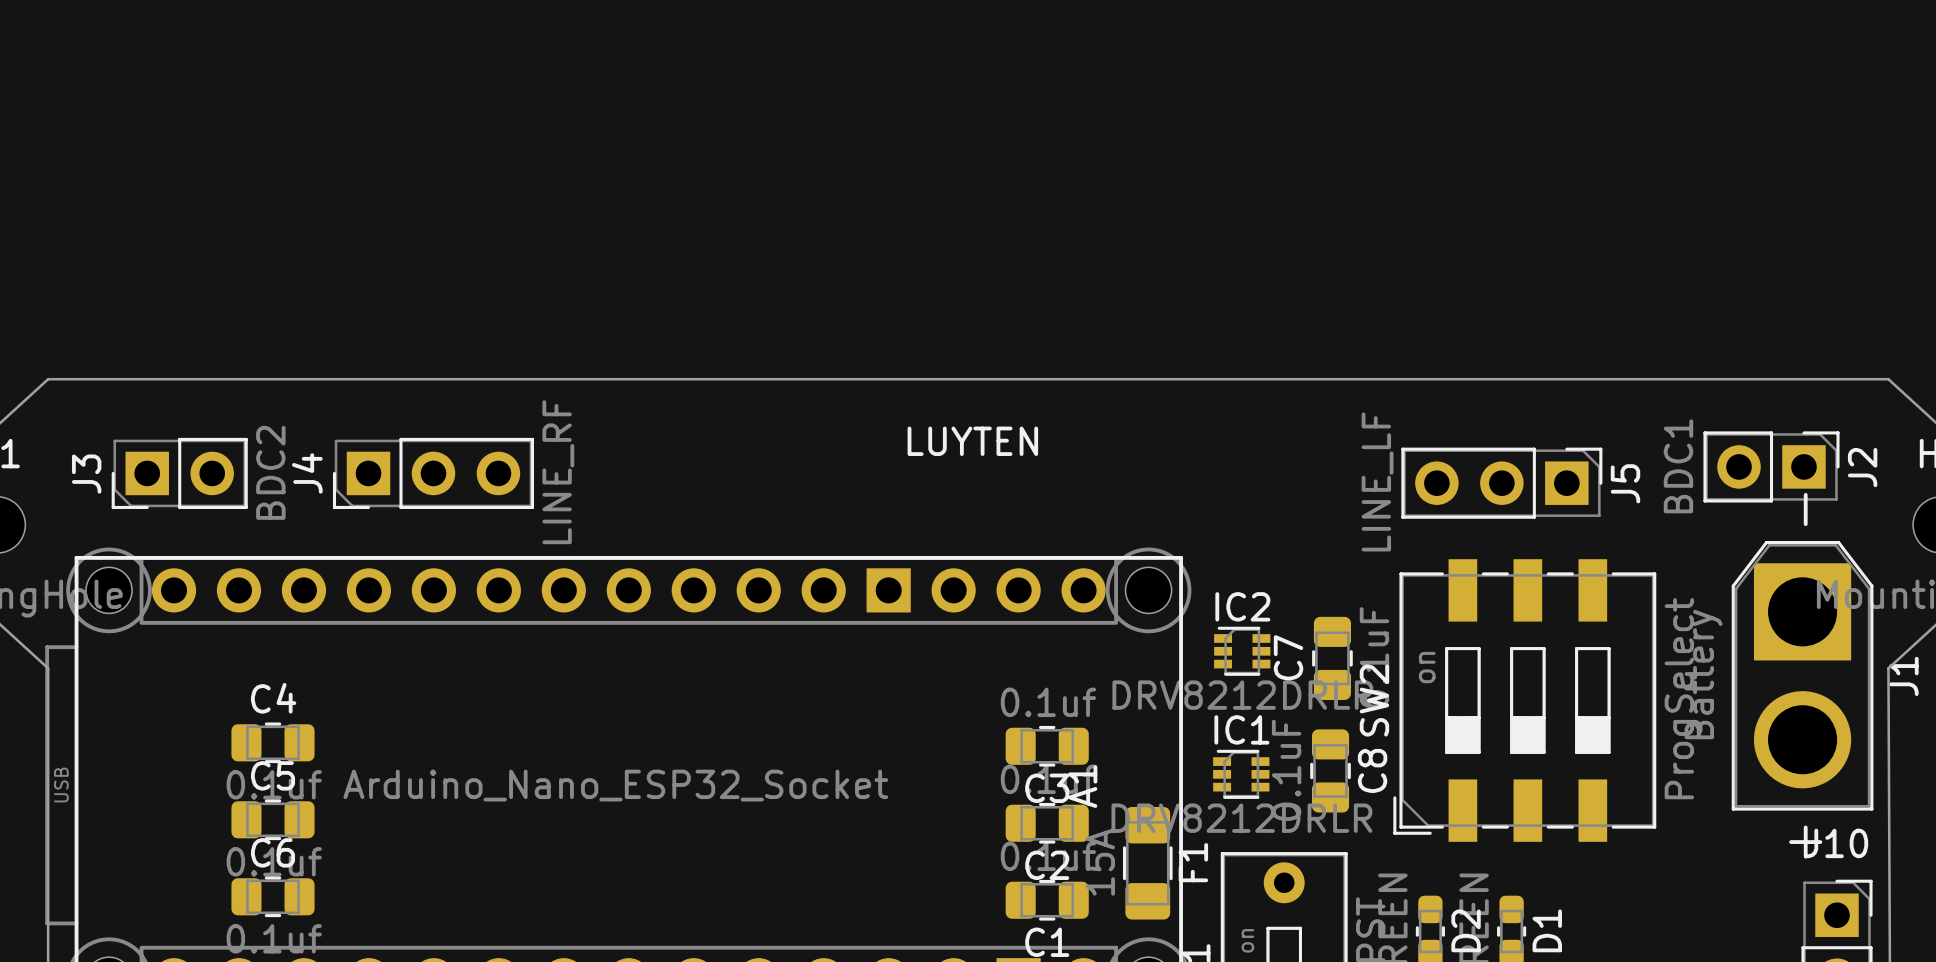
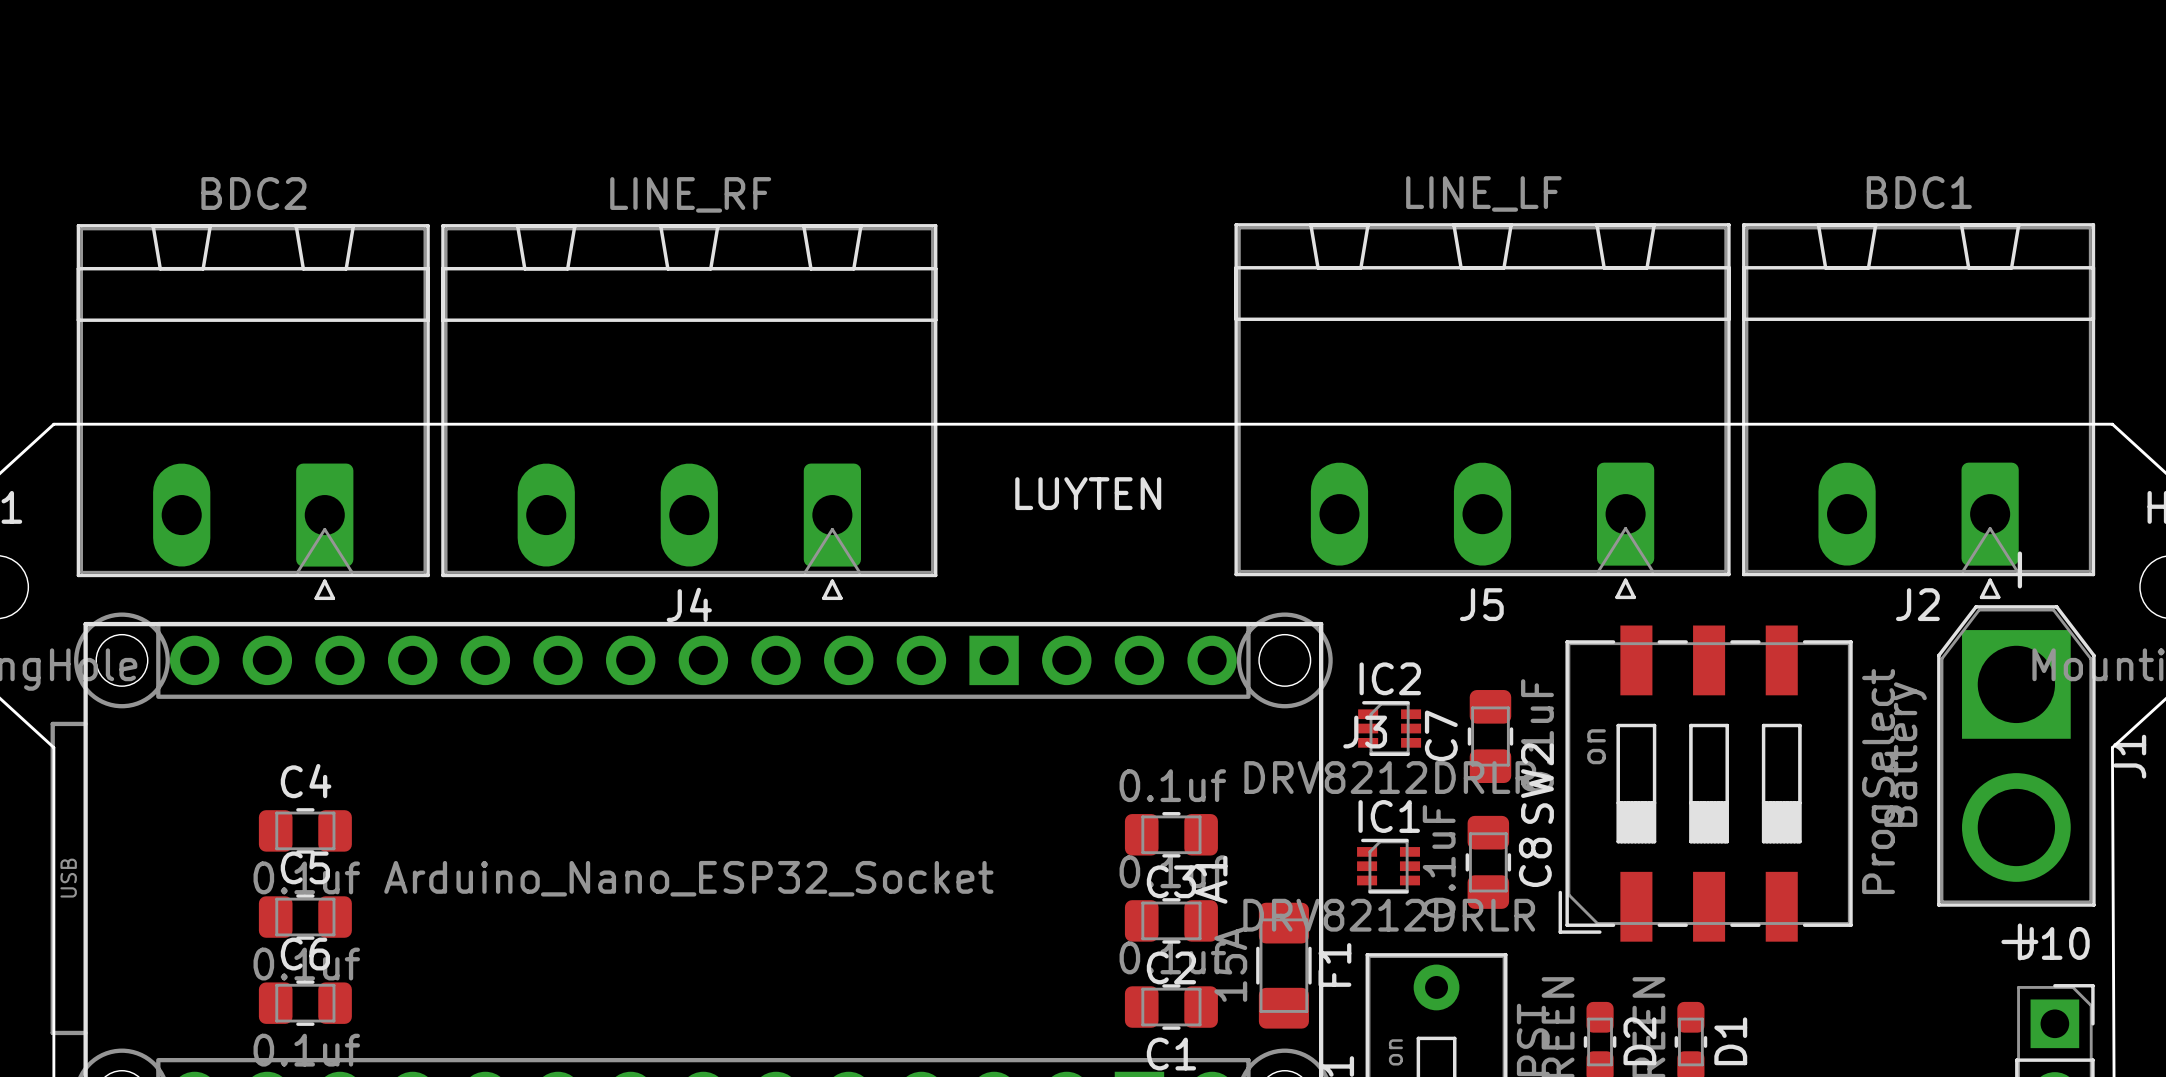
J2 footprint: [1703, 431, 1840, 503] -> [1742, 223, 2096, 600]
J3 footprint: [111, 437, 248, 509] -> [76, 224, 430, 601]
J4 footprint: [332, 437, 535, 509] -> [441, 224, 938, 601]
J5 footprint: [1401, 447, 1603, 519] -> [1234, 223, 1731, 600]
J2 value position: BDC1 (1678, 466) -> BDC1 (1919, 192)
J2 name position: J2 (1862, 467) -> J2 (1917, 604)
J3 value position: BDC2 (270, 472) -> BDC2 (253, 193)
J4 value position: LINE_RF (558, 472) -> LINE_RF (690, 194)
J4 name position: J4 (307, 473) -> J4 (689, 604)
J3 name position: J3 (86, 474) -> J3 (1365, 732)
J5 value position: LINE_LF (1377, 481) -> LINE_LF (1483, 193)
J5 name position: J5 (1625, 483) -> J5 (1481, 604)

